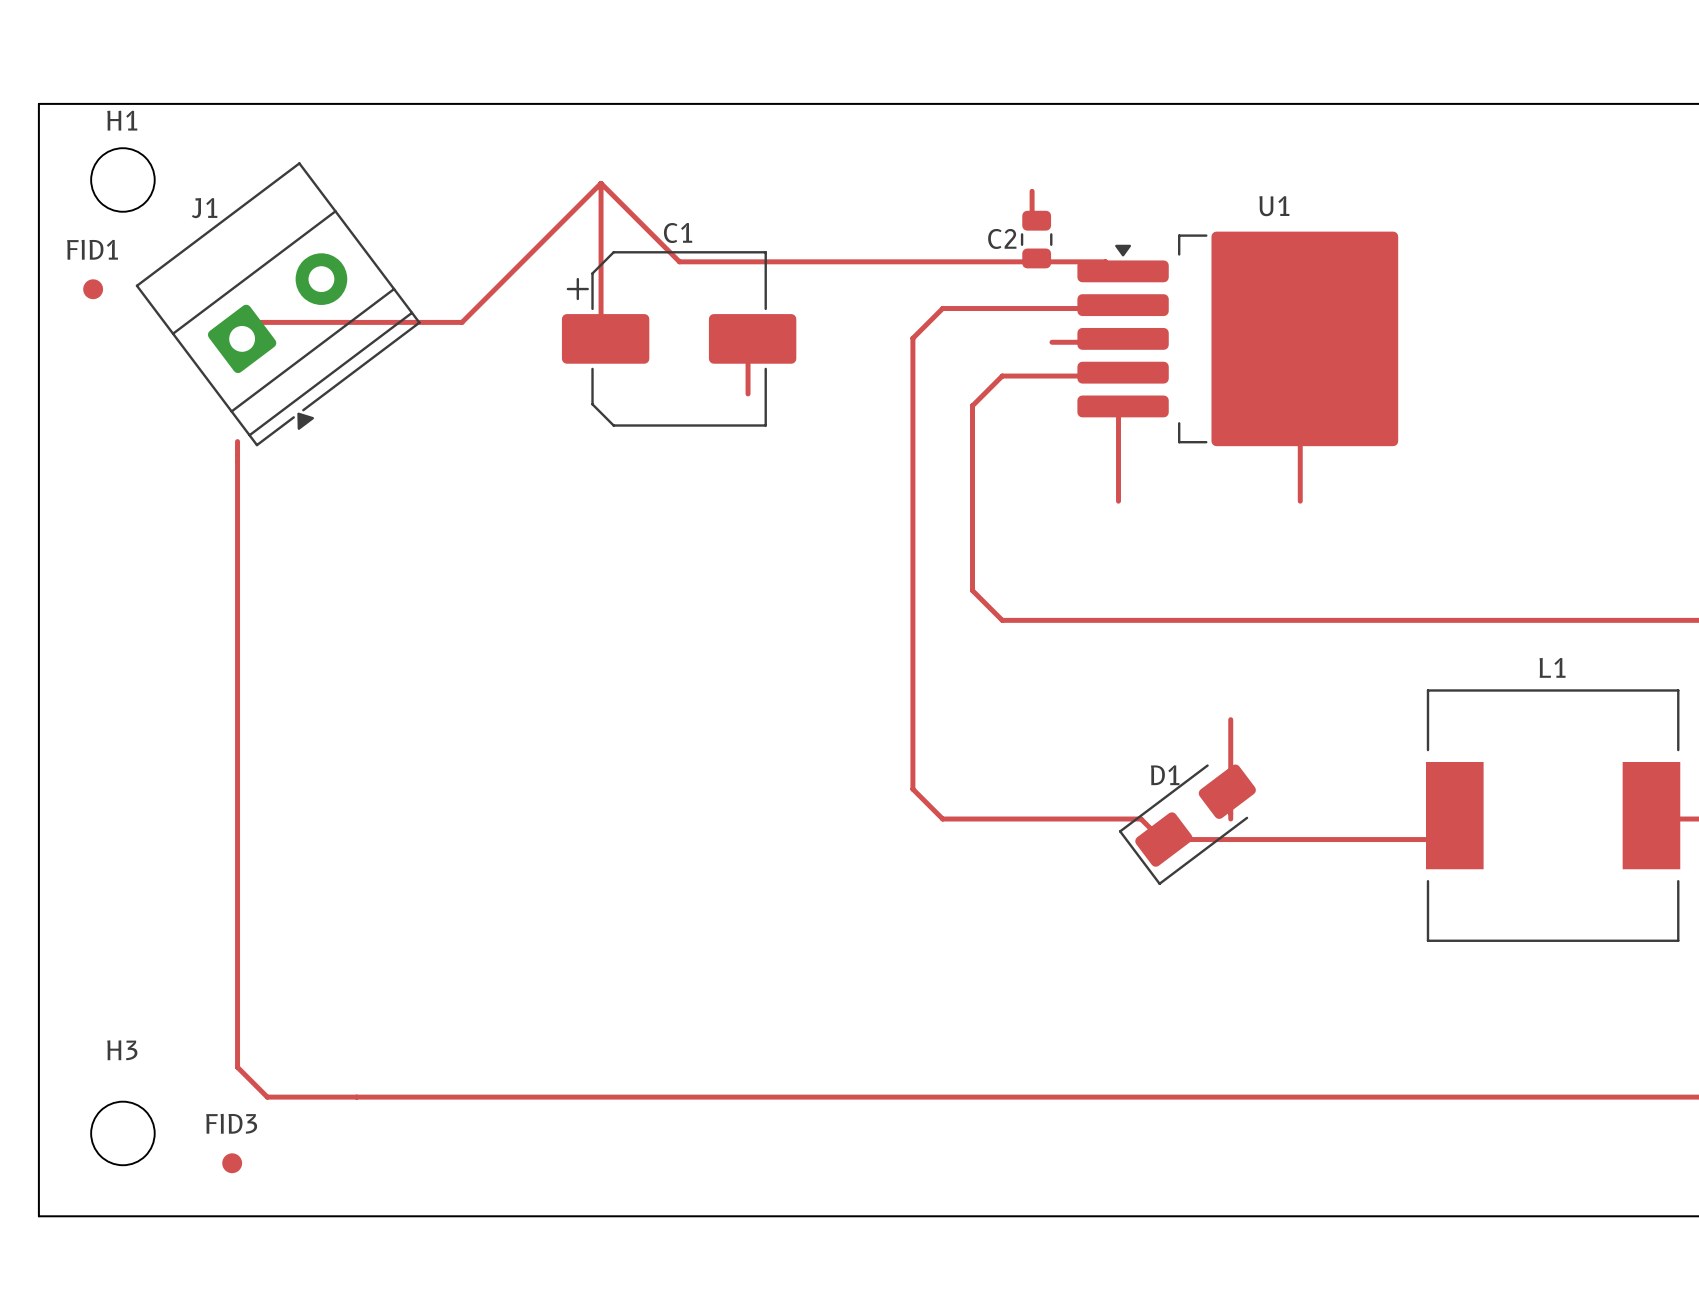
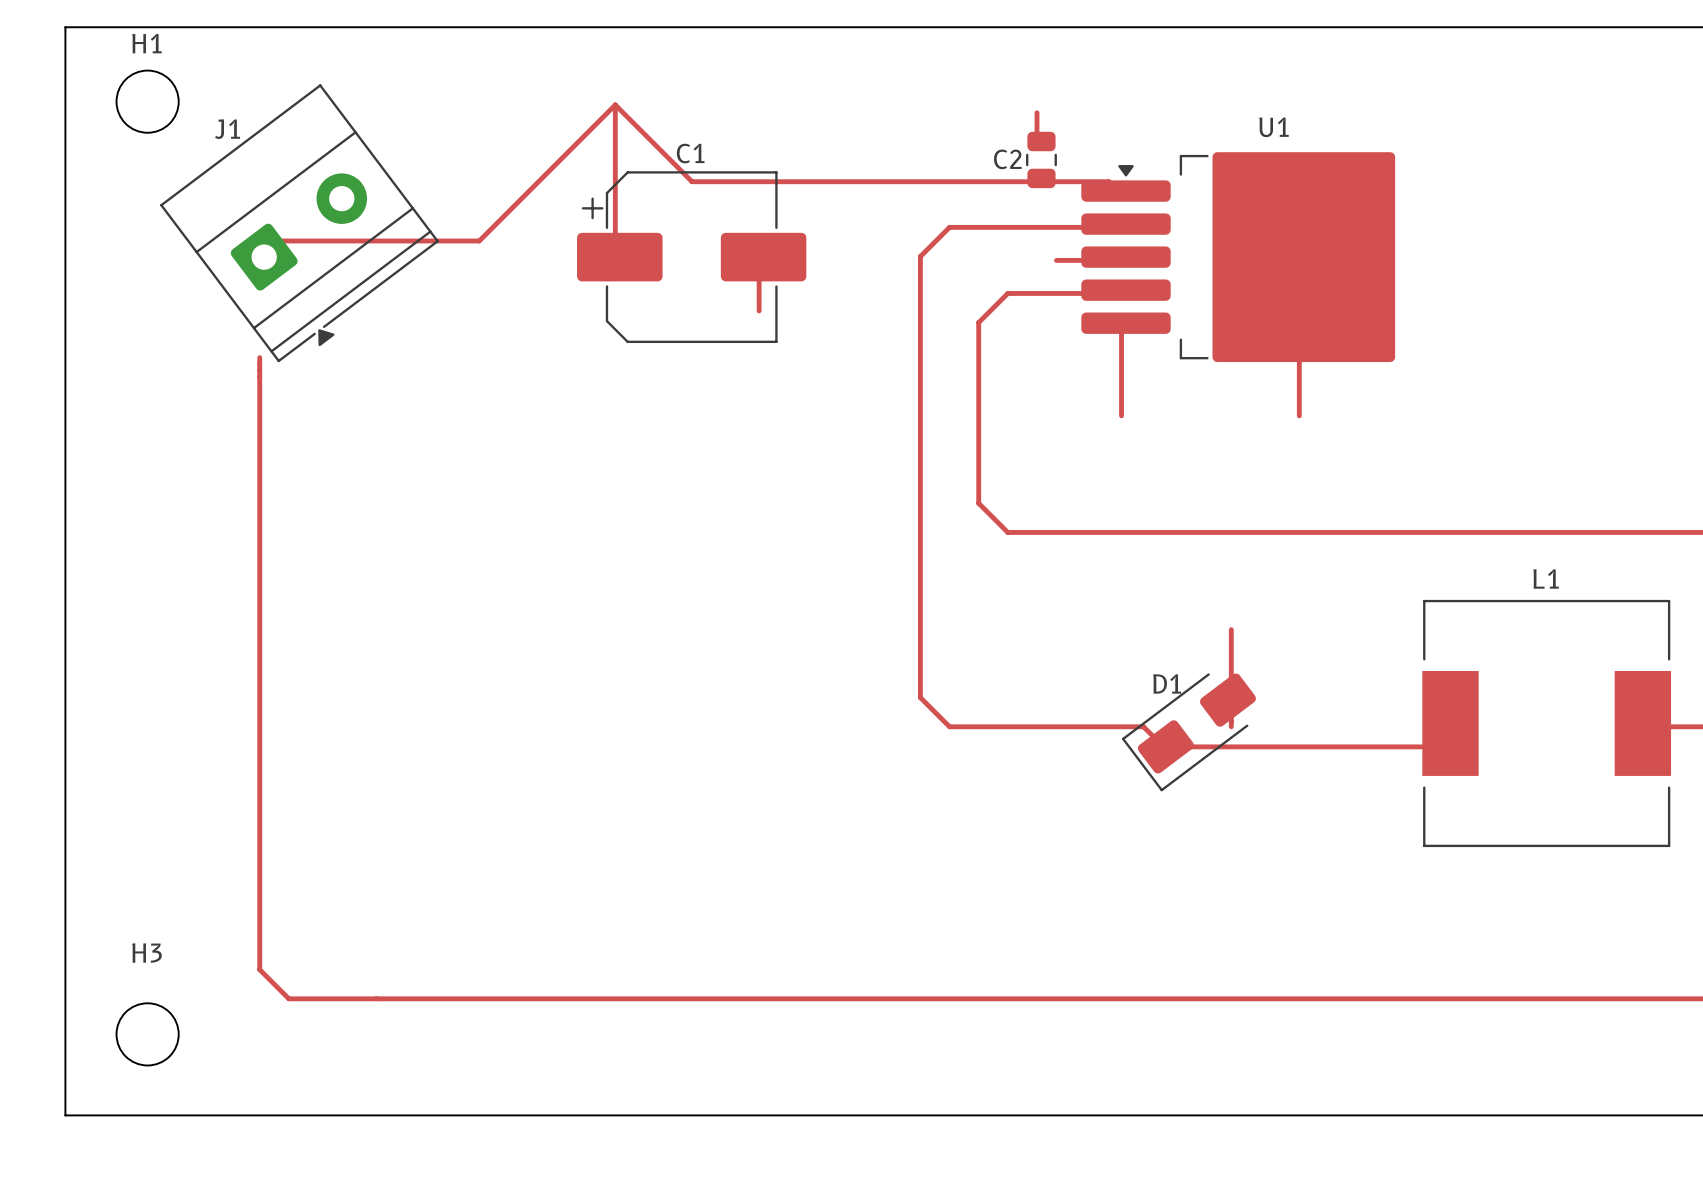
FID1: (93, 289) -> none
FID3: (232, 1163) -> none

